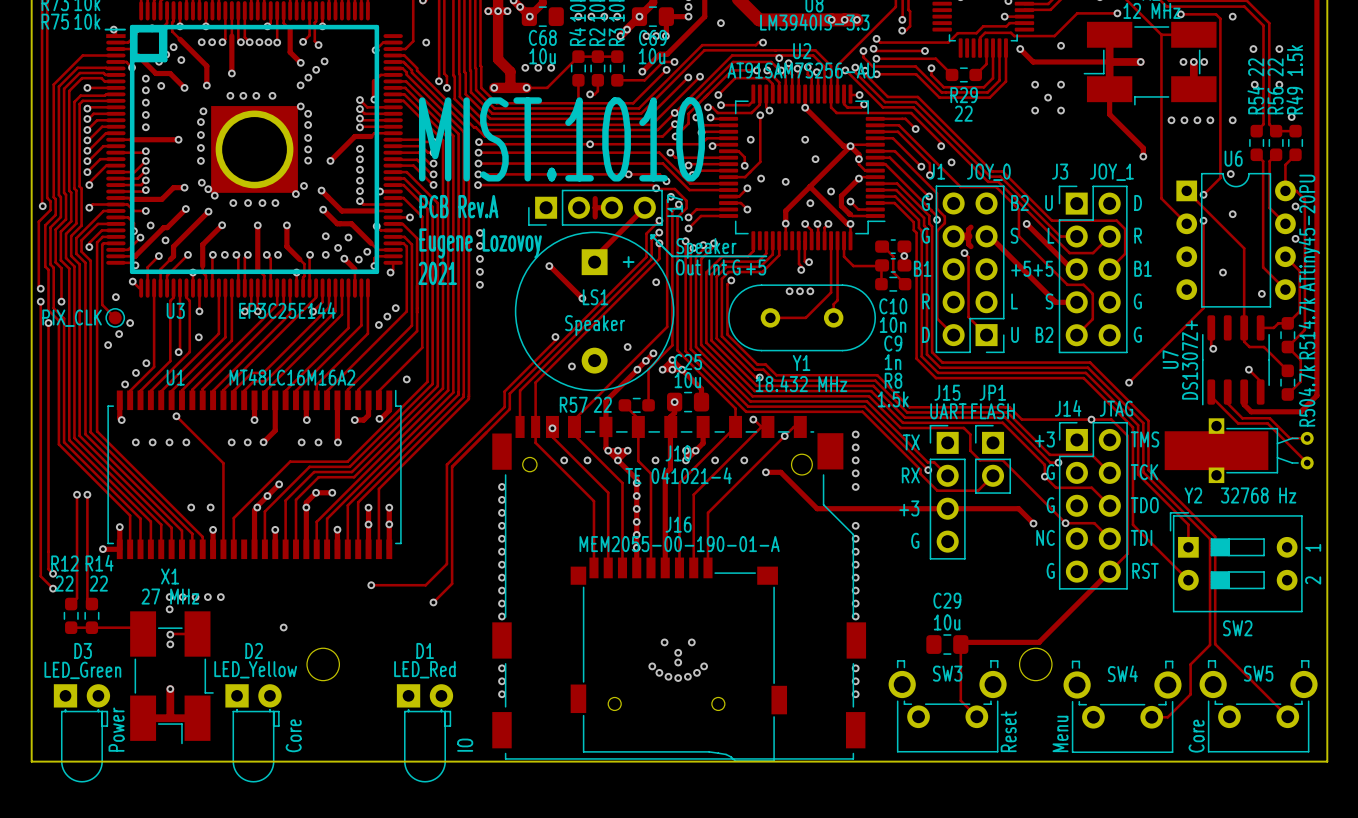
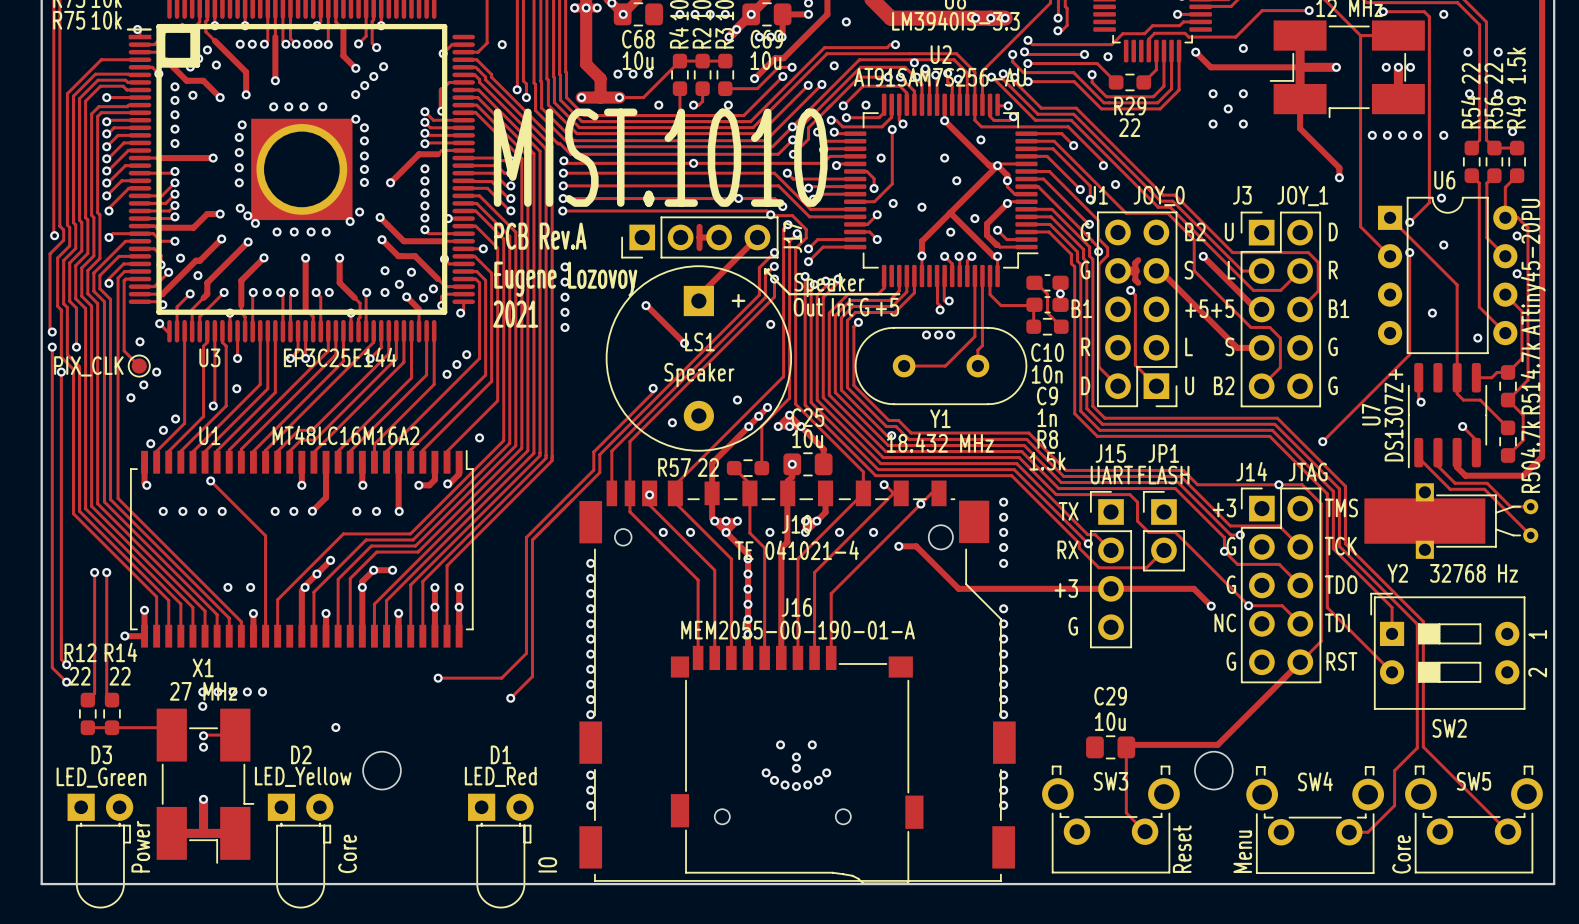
via: none -> (1108, 56)
via: none -> (834, 65)
via: none -> (658, 105)
via: none -> (728, 105)
via: none -> (866, 105)
via: none -> (980, 139)

